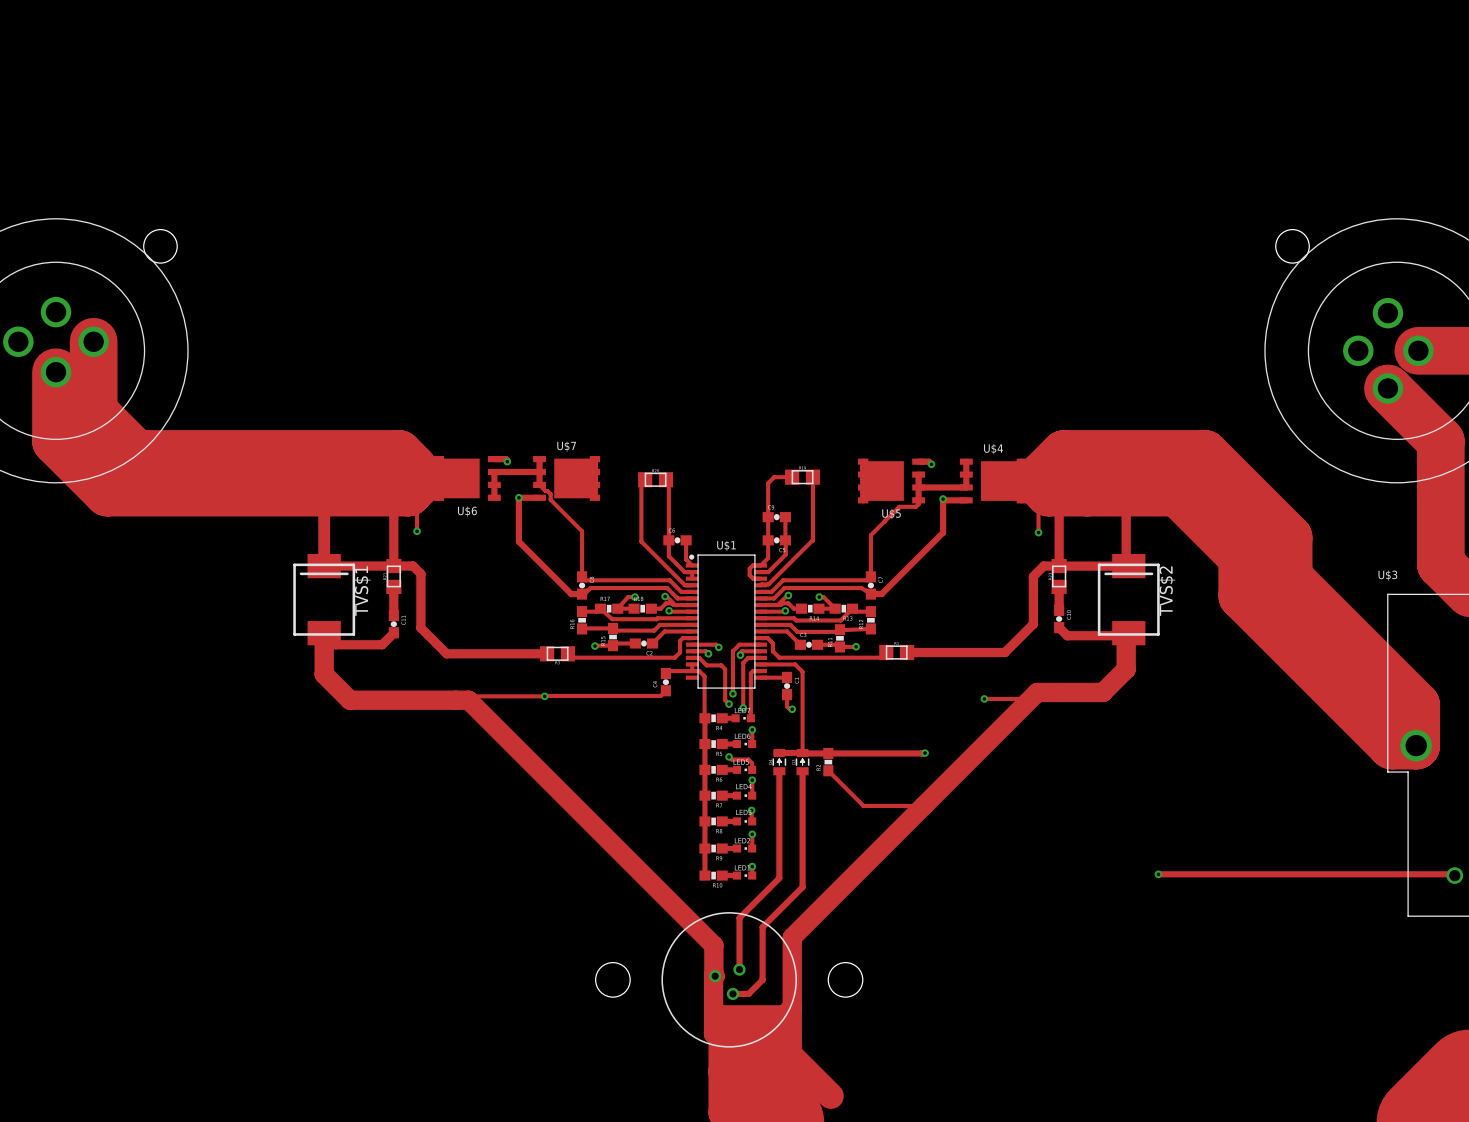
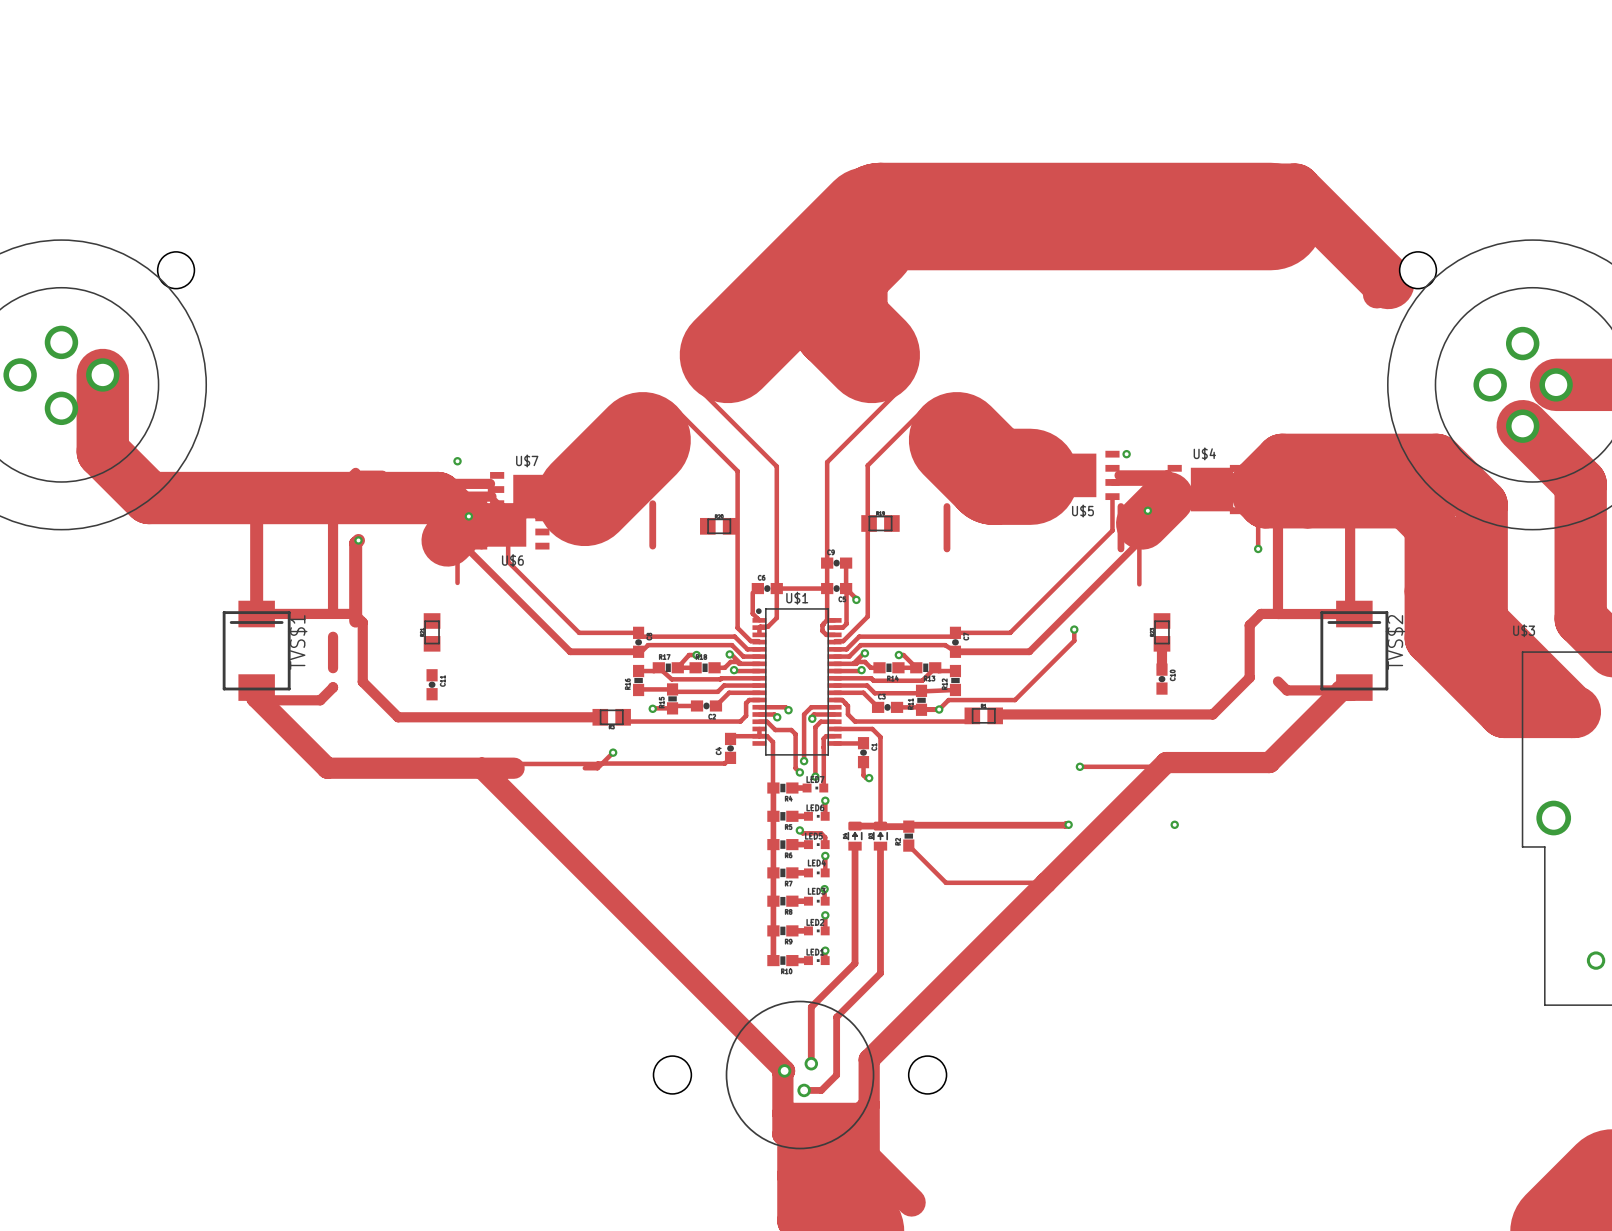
track: none -> (1211, 216) (1238, 189) (1294, 189) (1388, 283) (1377, 294)
track: (56, 372) (56, 441) (107, 492) (408, 492) -> none
via: none -> (1126, 454)
via: none -> (457, 461)
track: none -> (355, 472) (348, 479) (348, 498) (333, 513) (333, 613)
track: none -> (1350, 473) (1350, 609) (1354, 614) (1278, 614)
track: none -> (358, 475) (382, 475)
track: none -> (1119, 475) (1167, 475) (1174, 482) (1112, 482)
track: none -> (1256, 489) (1256, 485) (1282, 459) (1436, 459) (1481, 505) (1481, 621) (1572, 711)
track: none -> (259, 498) (256, 500) (256, 614)
track: (539, 459) (539, 484) (550, 494) (550, 499) (582, 531) (582, 576) -> (491, 496) (450, 496) (443, 489) (449, 483) (490, 483) (490, 494) (508, 512) (508, 561) (579, 632) (638, 632)
via: (507, 461) -> none
track: (966, 461) (966, 487) (918, 487) -> none
via: (931, 464) -> none
via: none -> (1147, 510)
track: (1126, 466) (1126, 563) (1128, 566) (1059, 566) -> none
via: none -> (468, 516)
track: (539, 472) (494, 472) (494, 497) -> none
track: (918, 474) (918, 504) (916, 506) (899, 506) (870, 535) (870, 576) -> (1112, 496) (1112, 530) (1010, 632) (955, 632)
track: (792, 477) (774, 477) (768, 483) (768, 558) (760, 565) -> none
track: (812, 477) (812, 540) -> none
U$7 position: (566, 478) -> (526, 496)
track: (645, 479) (641, 483) (641, 541) (685, 585) (692, 585) -> (534, 496) (550, 496) (557, 503) (563, 498) (584, 498) (642, 440) (637, 432) (665, 404) (671, 404) (737, 471) (737, 627) (750, 641) (759, 642)
track: (665, 479) (668, 482) (668, 556) (684, 572) (692, 572) -> (1270, 216) (880, 216) (853, 243) (867, 229) (867, 215) (726, 356) (712, 356) (692, 376) (692, 382) (776, 466) (776, 617) (768, 626) (759, 627)
track: (1113, 479) (1000, 481) -> none
U$5 position: (891, 481) -> (1082, 475)
U$4 position: (993, 481) -> (1204, 489)
track: (1042, 486) (1048, 492) (1177, 492) (1242, 557) -> none
via: none -> (358, 540)
track: (408, 492) (393, 506) (393, 566) -> none
via: (518, 497) -> none
track: (539, 497) (518, 497) (518, 541) (571, 594) -> (470, 517) (468, 516) (468, 550) (570, 651) (626, 651)
via: (943, 499) -> none
track: (966, 500) (943, 499) (943, 532) (881, 594) -> (1174, 510) (1147, 510) (1149, 531) (1029, 651) (967, 651)
track: none -> (1258, 548) (1258, 495) (1265, 502) (1406, 502) (1430, 526) (1430, 638) (1504, 711) (1574, 711)
via: none -> (1258, 548)
track: none -> (846, 563) (846, 588) (856, 599)
part position: (776, 517) -> (836, 563)
track: (785, 517) (785, 554) (771, 568) -> (846, 588) (846, 623)
track: (1268, 518) (1255, 518) (1242, 531) (1242, 595) (1392, 745) (1416, 745) (1416, 705) (1288, 577) (1288, 537) (1204, 453) (1064, 453) (1059, 459) (1059, 566) (1043, 566) (1033, 576) (1033, 624) (1005, 652) (907, 652) -> (1275, 489) (1277, 492) (1277, 613) (1261, 613) (1249, 625) (1249, 677) (1212, 714) (995, 715)
via: (417, 531) -> none
via: (1038, 532) -> none
track: none -> (776, 588) (827, 588)
part position: (677, 540) -> (767, 588)
part position: (776, 540) -> (836, 588)
track: (812, 540) (790, 562) -> (1030, 476) (993, 476) (956, 440) (956, 435) (927, 406) (867, 465) (867, 616)
via: none -> (856, 599)
track: (753, 565) (749, 570) -> (867, 243) (839, 271) (839, 322) (898, 382) (907, 382) (827, 462) (827, 620) (822, 625)
track: (324, 566) (413, 566) (420, 573) (420, 628) (446, 653) -> (256, 613) (354, 613) (362, 622) (362, 681) (398, 717) (490, 717)
track: none -> (1074, 629) (1074, 640) (1015, 700) (948, 700) (939, 709) (921, 709)
via: none -> (1074, 629)
track: (393, 586) (393, 615) -> (333, 636) (333, 668)
TVS$1 position: (324, 599) -> (256, 650)
TVS$2 position: (1128, 599) -> (1354, 650)
track: (1059, 627) (1067, 635) (1126, 635) -> (1277, 681) (1286, 690) (1351, 690)
track: (393, 632) (382, 644) (335, 644) (324, 633) (324, 674) (349, 700) -> (333, 687) (320, 700) (269, 700) (256, 687) (256, 697) (327, 768) (383, 768)
track: (1126, 635) (1126, 669) (1102, 692) (1037, 692) (792, 937) (792, 965) -> (1351, 690) (1341, 690) (1269, 762) (1166, 762) (869, 1059)
track: none -> (613, 752) (597, 768) (584, 768)
via position: (544, 696) -> (613, 752)
track: (468, 700) (713, 945) (713, 974) -> (464, 768) (481, 768) (783, 1069)
via: none -> (1174, 824)
track: (925, 753) (828, 753) -> (1068, 824) (908, 826)
via position: (925, 753) -> (1068, 824)
track: (862, 804) (923, 805) -> (945, 882) (1045, 882)
track: (1158, 874) (1454, 875) -> none
via: (1158, 874) -> none

